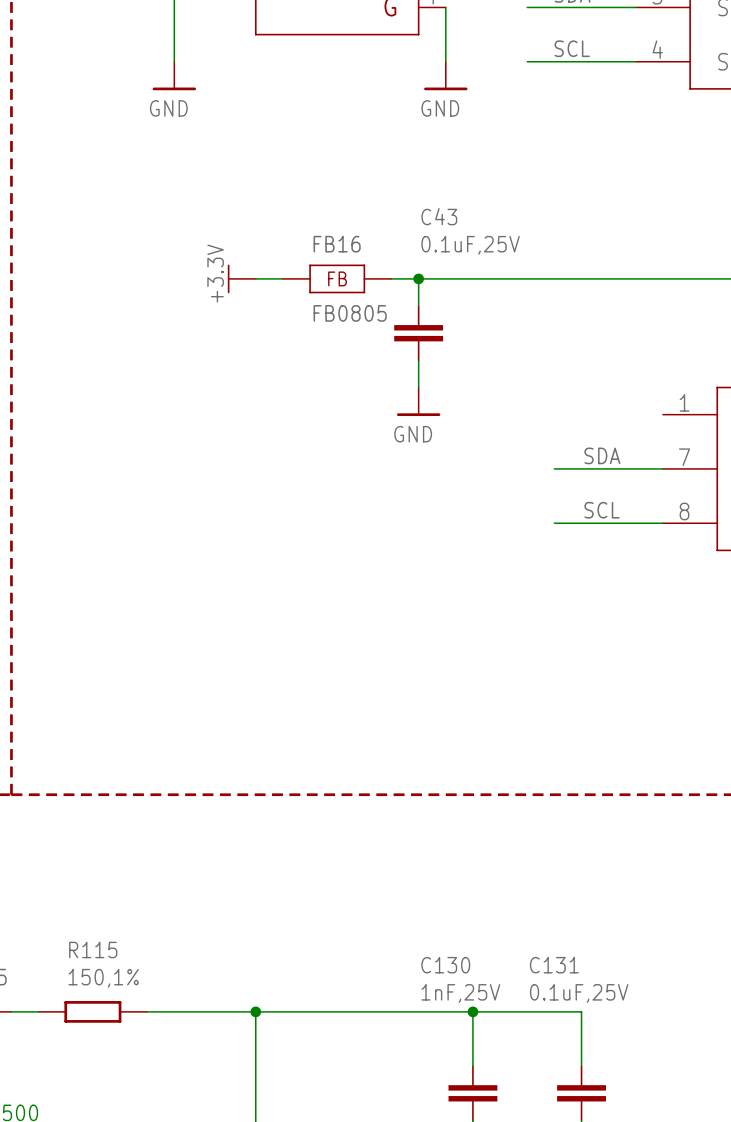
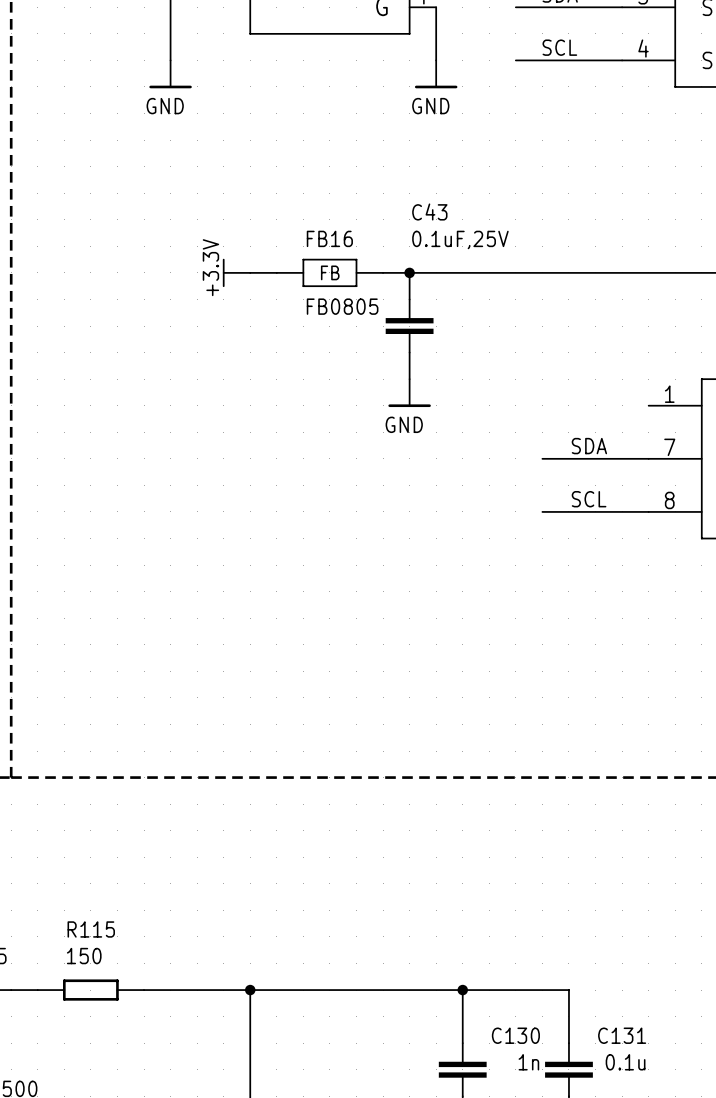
C130 name position: C130 (445, 965) -> C130 (515, 1035)
C131 name position: C131 (554, 965) -> C131 (622, 1035)
R115 value: 150,1% (103, 978) -> 150 (84, 956)
C130 value: 1nF,25V (460, 993) -> 1n (528, 1062)
C131 value: 0.1uF,25V (579, 993) -> 0.1u (625, 1062)

